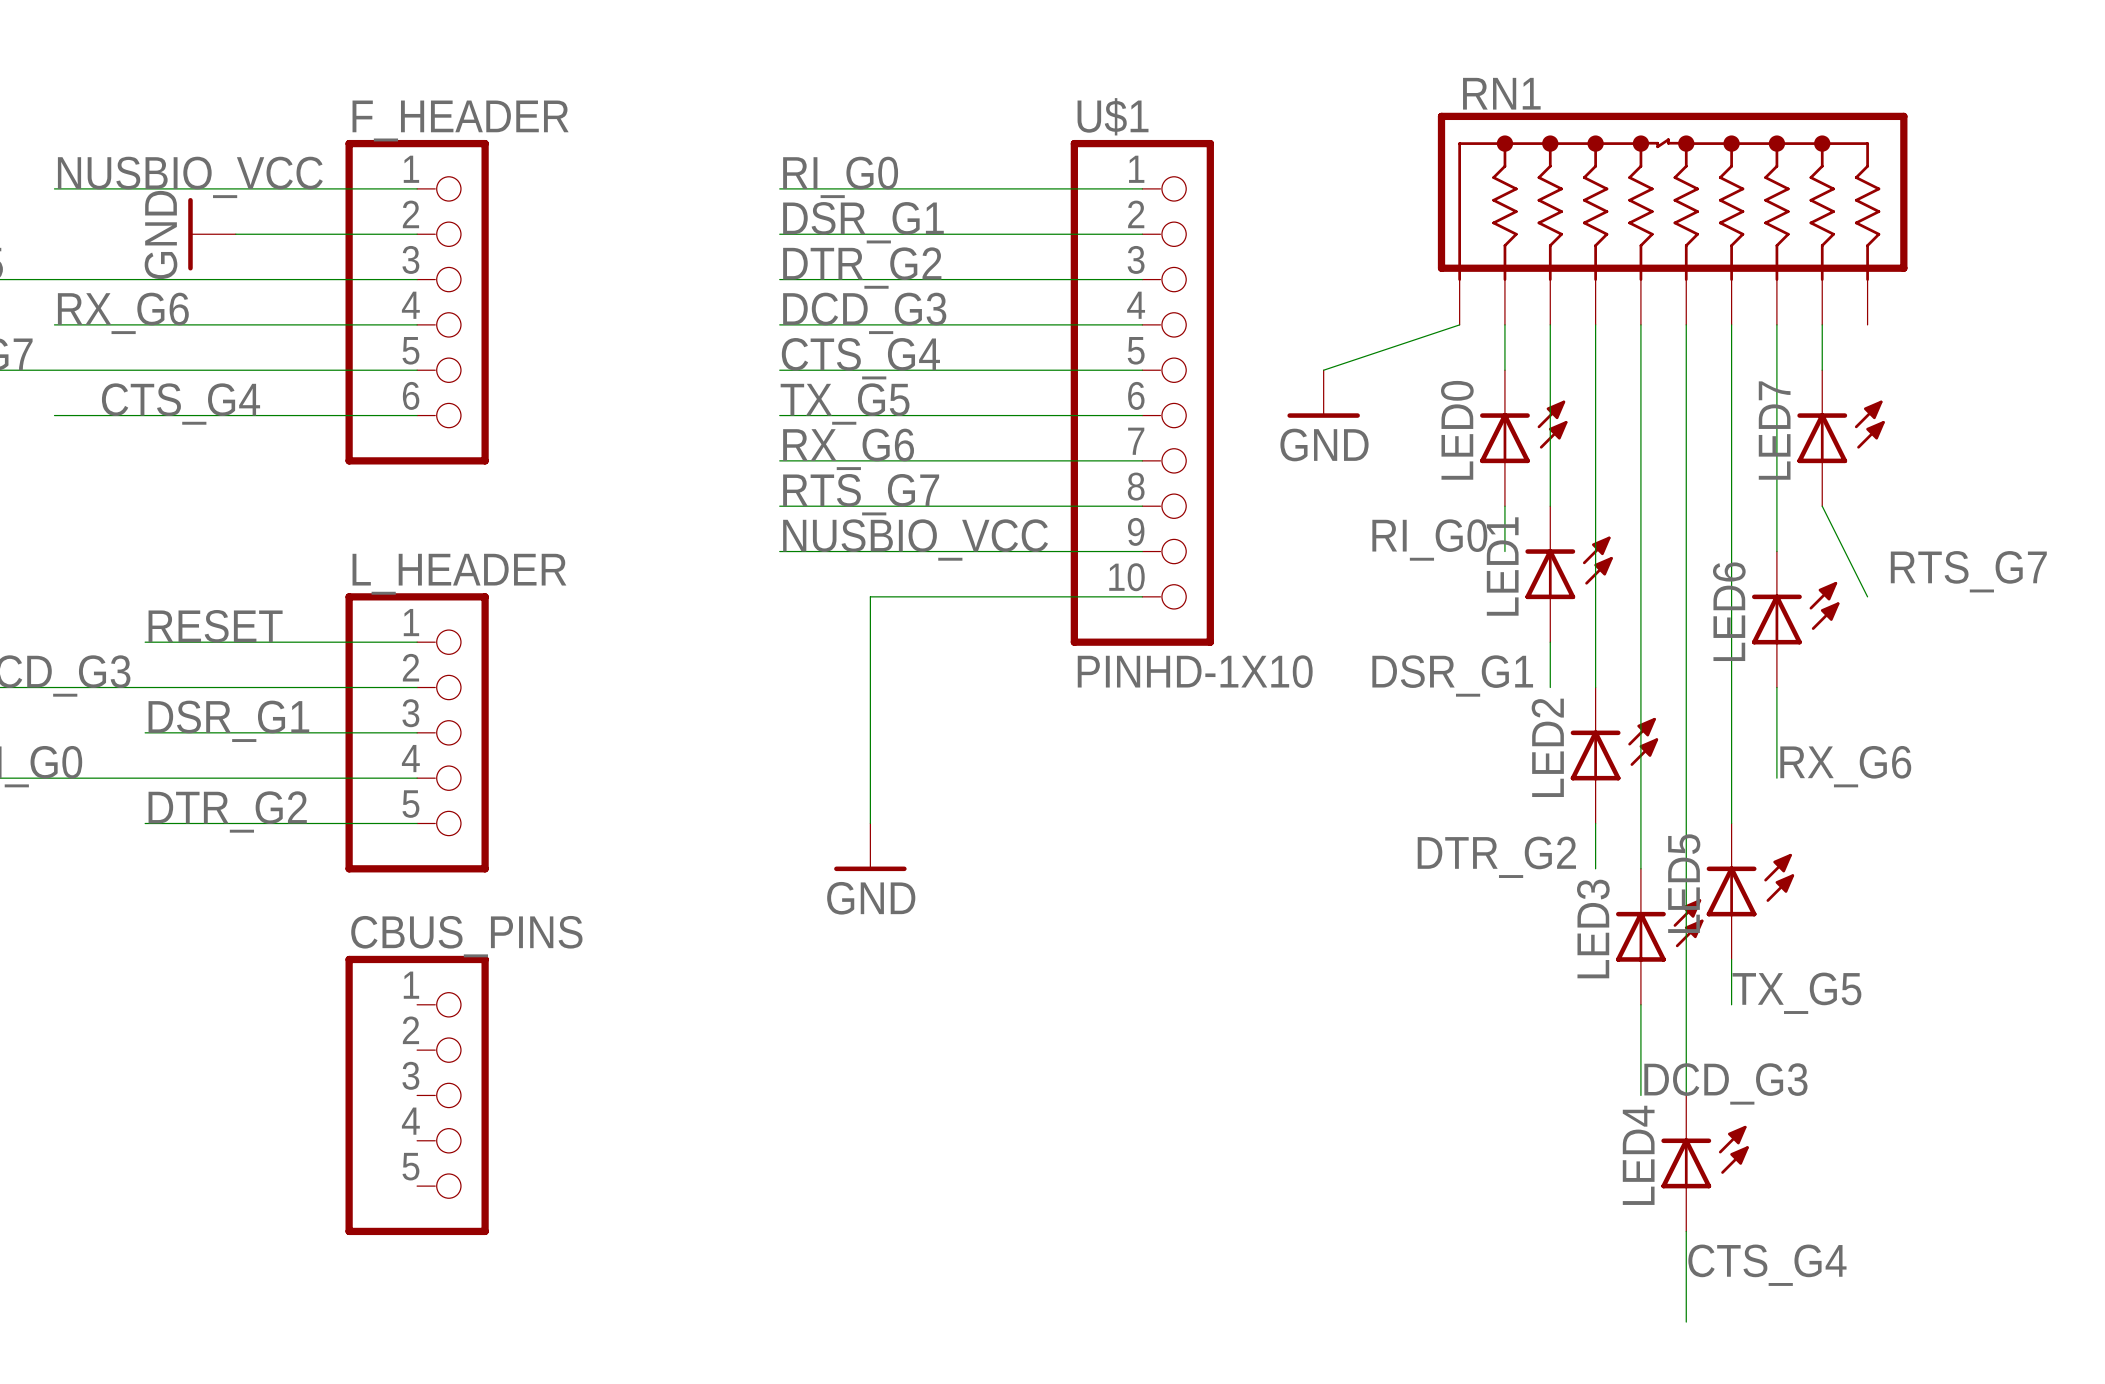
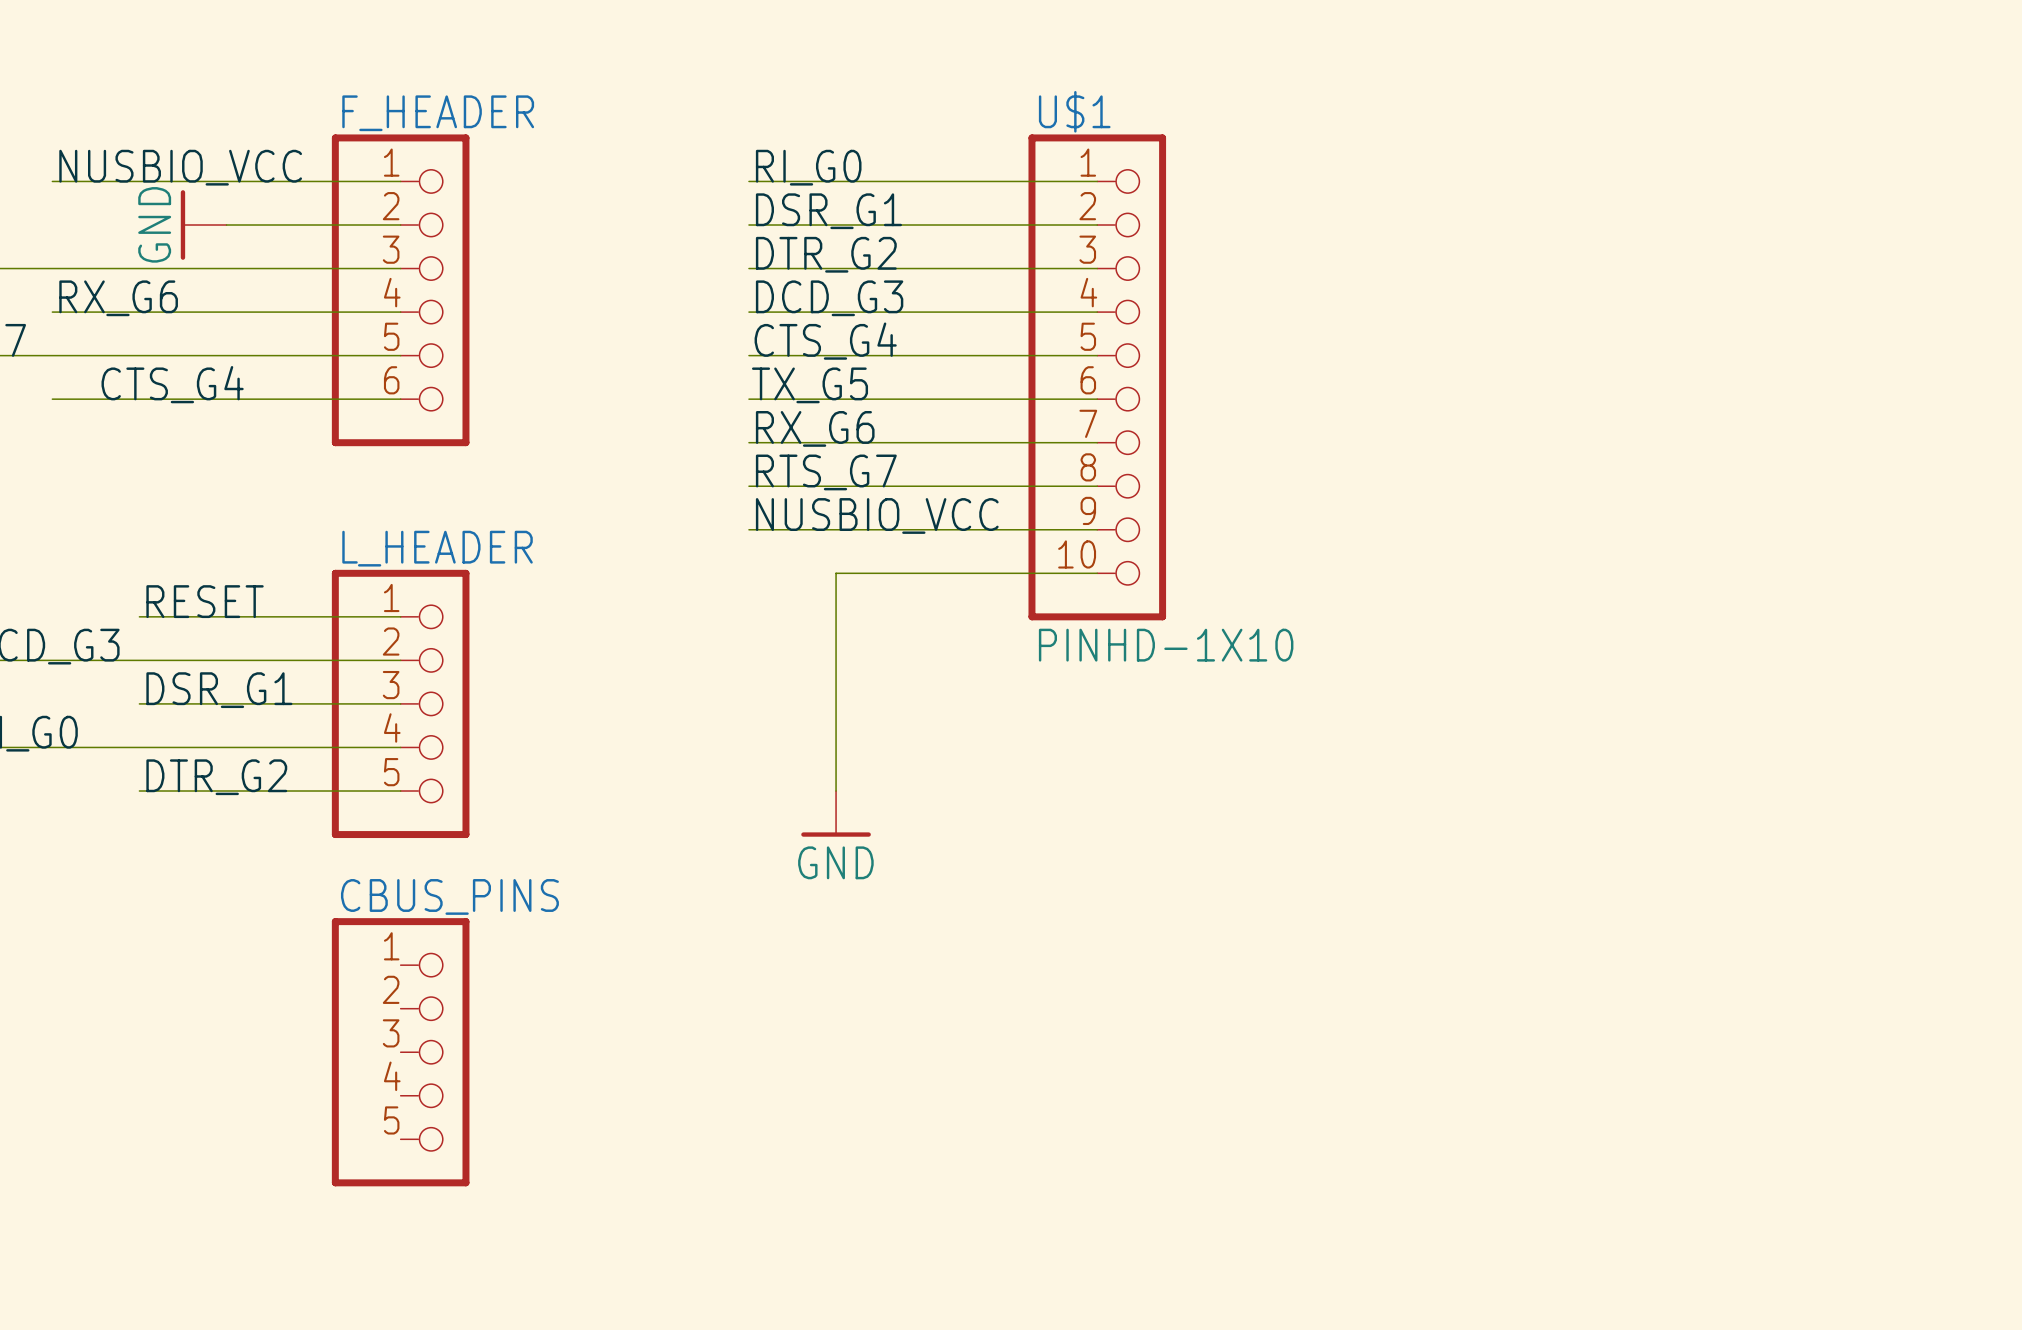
RN1: (1672, 218) -> none
wire: (1459, 324) (1323, 370) -> none
wire: (1504, 324) (1504, 370) -> none
wire: (1550, 324) (1550, 506) -> none
wire: (1595, 324) (1595, 687) -> none
wire: (1640, 324) (1640, 868) -> none
wire: (1686, 324) (1686, 1095) -> none
wire: (1731, 324) (1731, 823) -> none
wire: (1776, 324) (1776, 551) -> none
wire: (1822, 324) (1822, 370) -> none
power symbol: GND (1323, 394) -> none
LED0: (1523, 438) -> none
LED7: (1841, 438) -> none
wire: (1504, 506) (1504, 551) -> none
wire: (1822, 506) (1867, 596) -> none
label: RI_G0 (1429, 540) -> none
label: RTS_G7 (1968, 571) -> none
LED1: (1569, 574) -> none
LED6: (1795, 619) -> none
wire: (1550, 642) (1550, 687) -> none
label: DSR_G1 (1452, 675) -> none
wire: (1776, 687) (1776, 778) -> none
LED2: (1614, 755) -> none
label: RX_G6 (1845, 766) -> none
wire: (1595, 823) (1595, 868) -> none
label: DTR_G2 (1496, 857) -> none
LED5: (1750, 891) -> none
LED3: (1659, 936) -> none
wire: (1731, 959) (1731, 1004) -> none
label: TX_G5 (1796, 993) -> none
wire: (1640, 1004) (1640, 1095) -> none
label: DCD_G3 (1725, 1083) -> none
LED4: (1705, 1163) -> none
wire: (1686, 1231) (1686, 1322) -> none
label: CTS_G4 (1767, 1265) -> none

